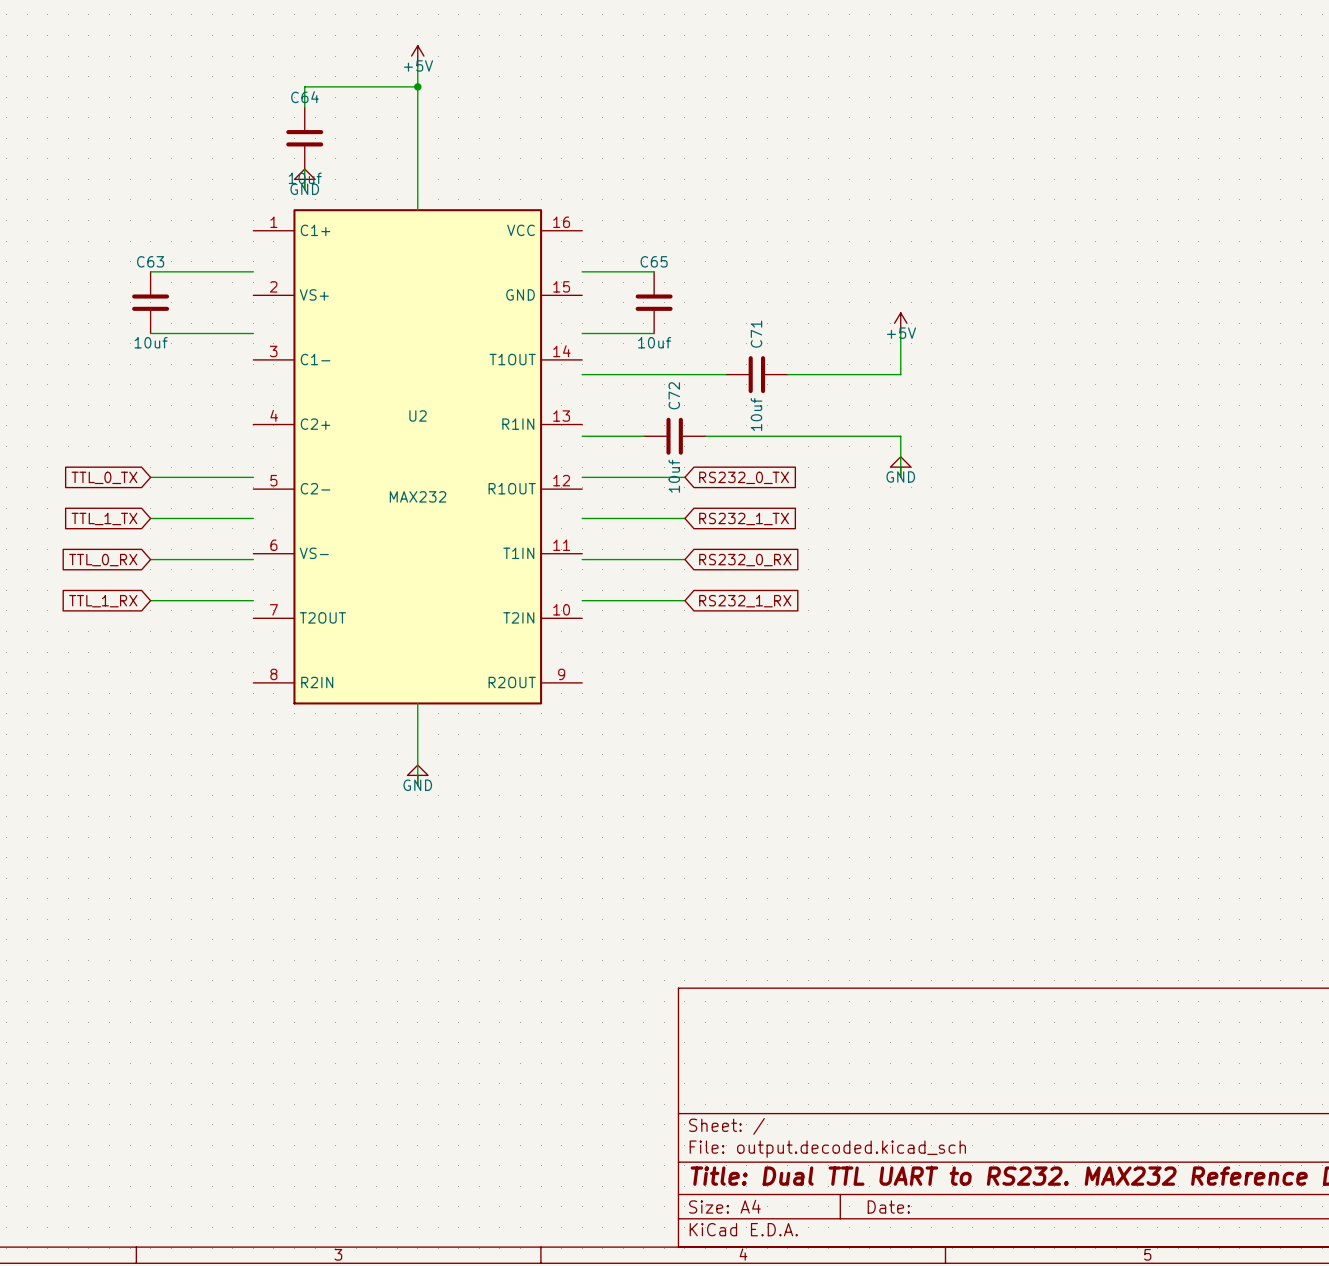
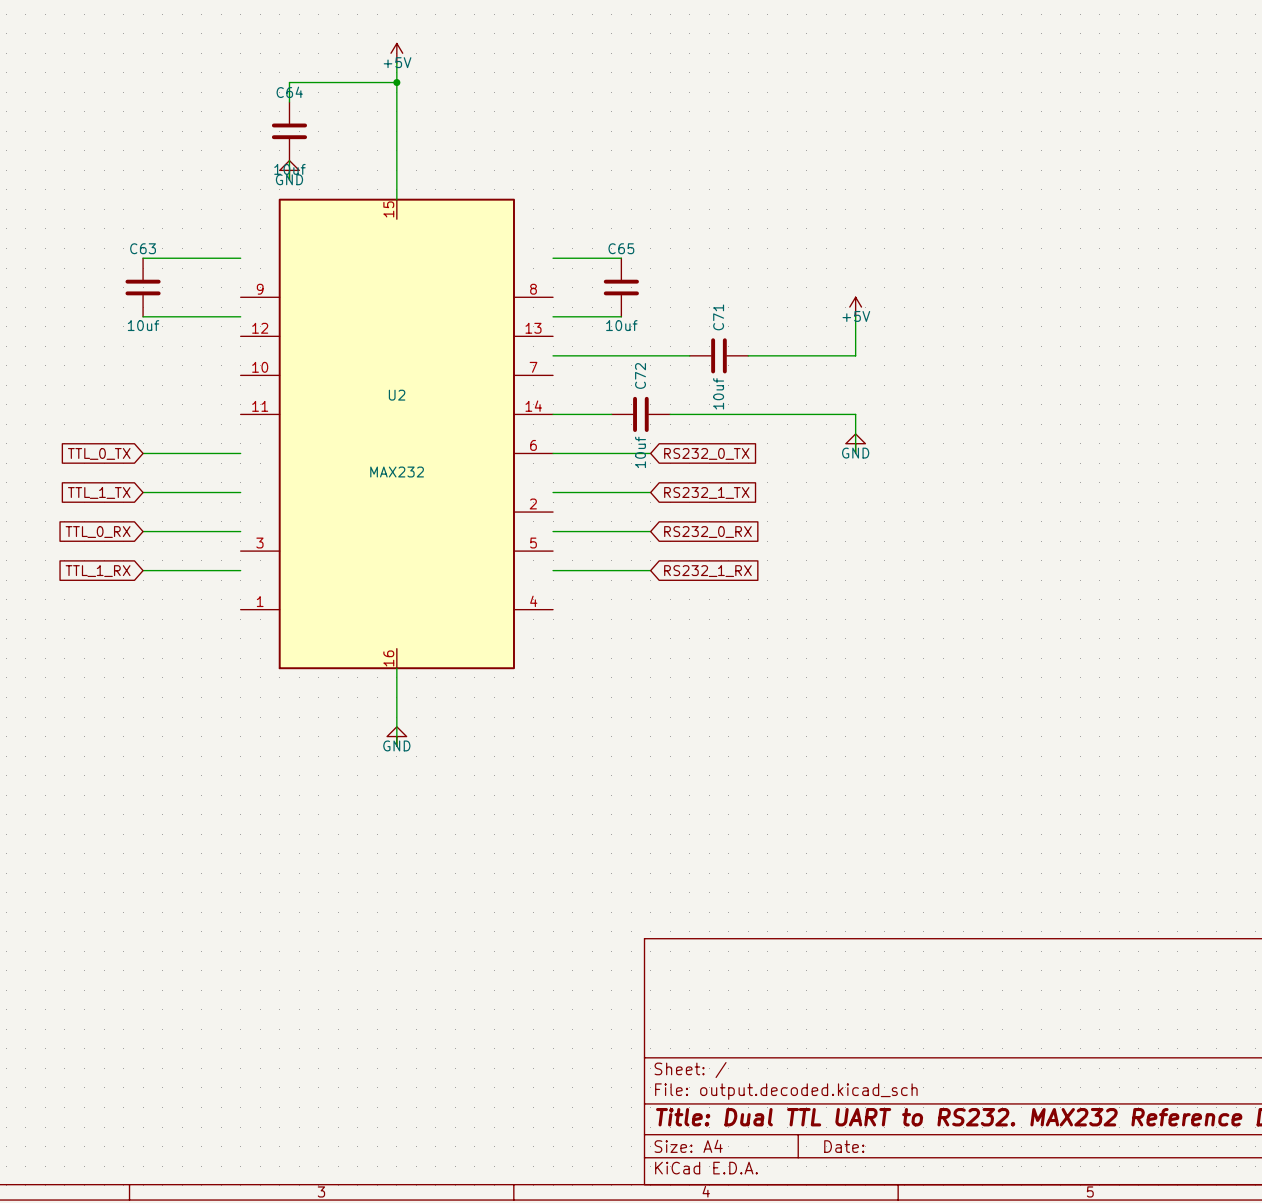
U2 symbol: [253, 209, 583, 705] -> [240, 198, 554, 670]

